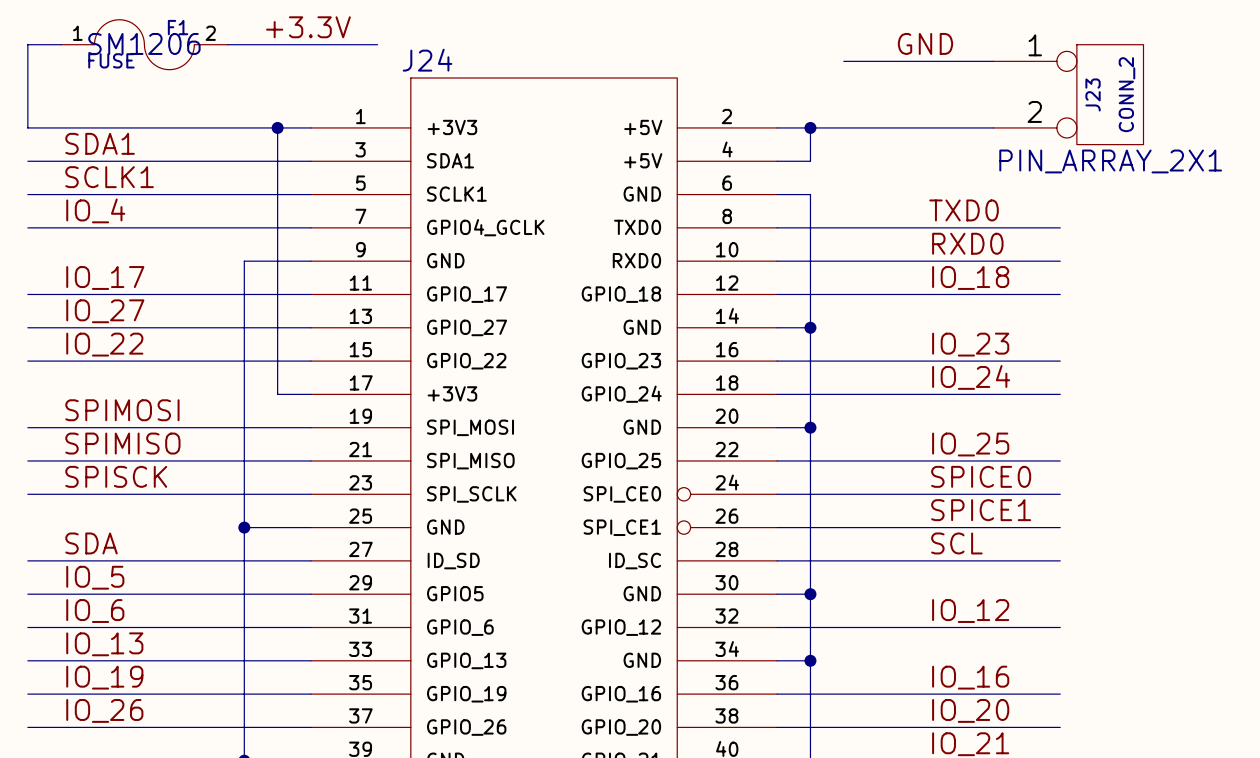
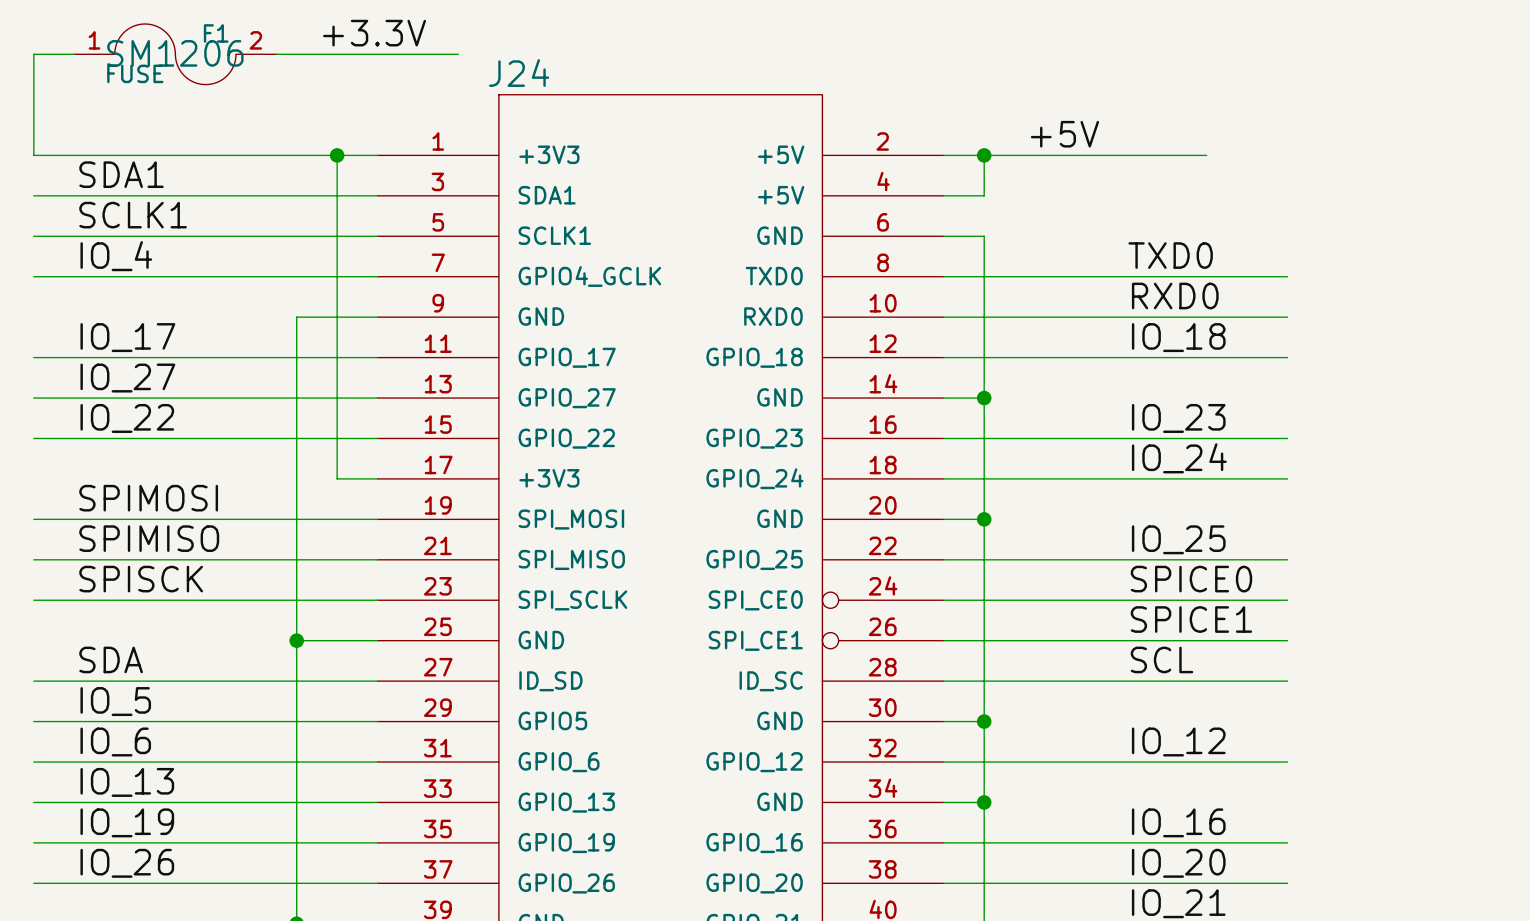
label: GND (925, 43) -> none
wire: (843, 61) (993, 61) -> none
J23: CONN_2 (1068, 94) -> none
label: none -> +5V (1064, 134)

